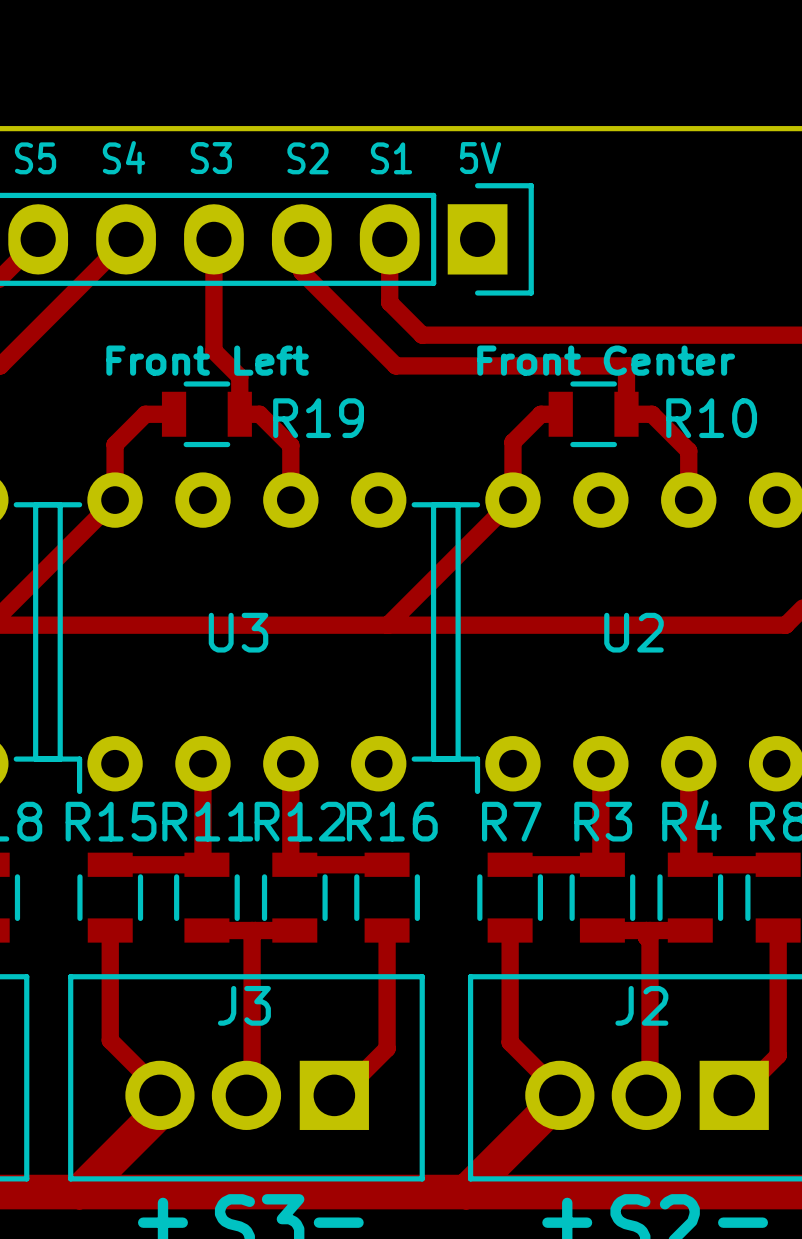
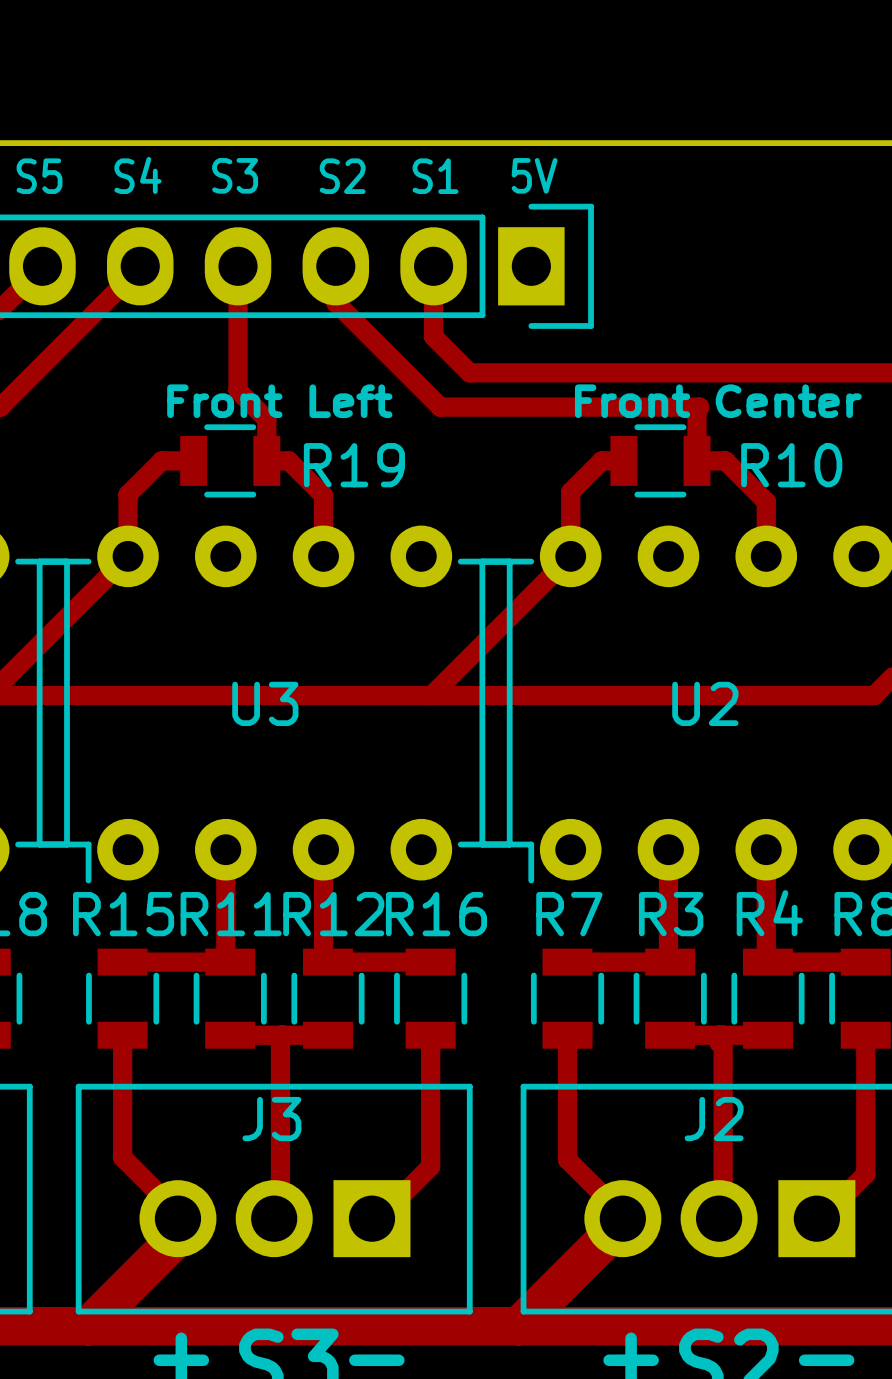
text position: Front Left (207, 360) -> Front Left (279, 401)
text position: Front Center (606, 360) -> Front Center (718, 401)

